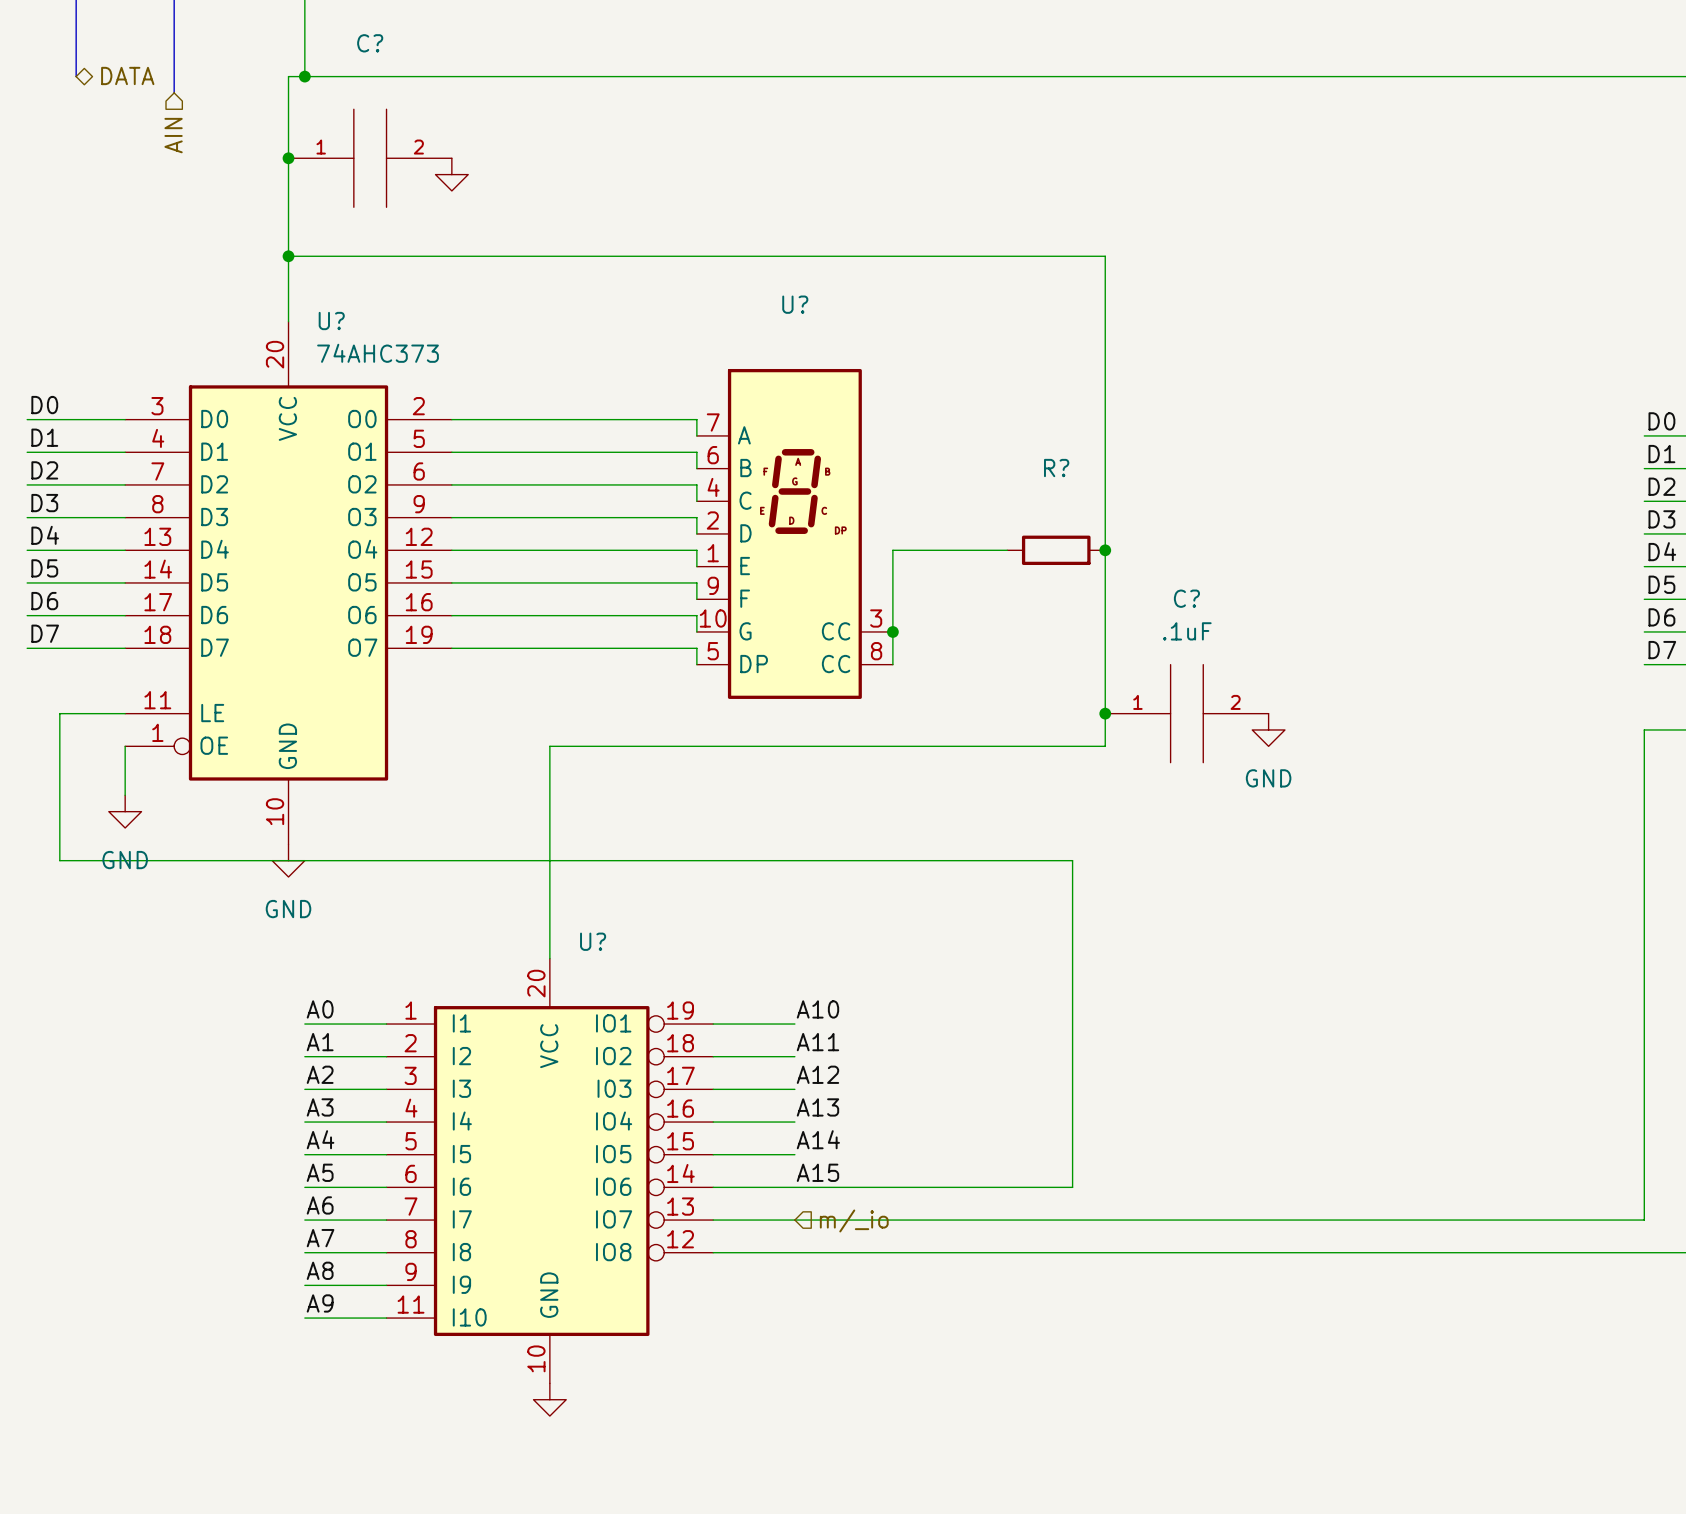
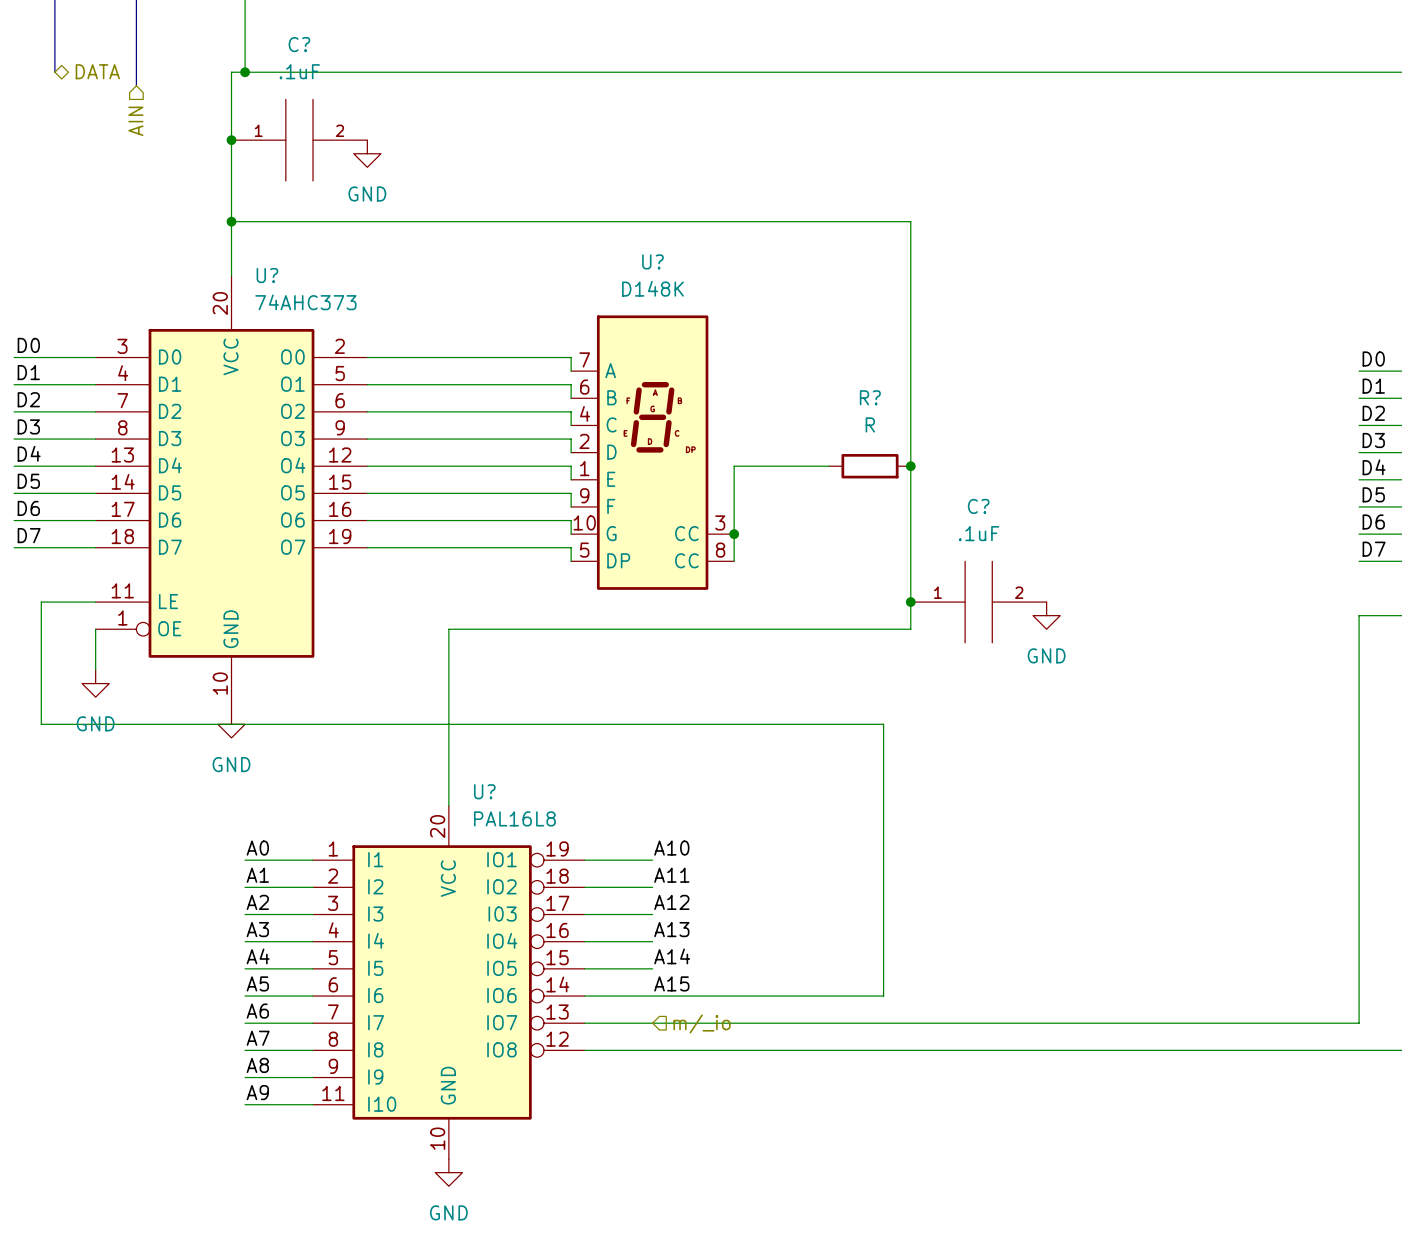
C? value: none -> .1uF (299, 71)
power symbol text: none -> GND (367, 193)
U? value: none -> D148K (652, 288)
R? value: none -> R (870, 424)
U? value: none -> PAL16L8 (514, 818)
power symbol text: none -> GND (448, 1212)

